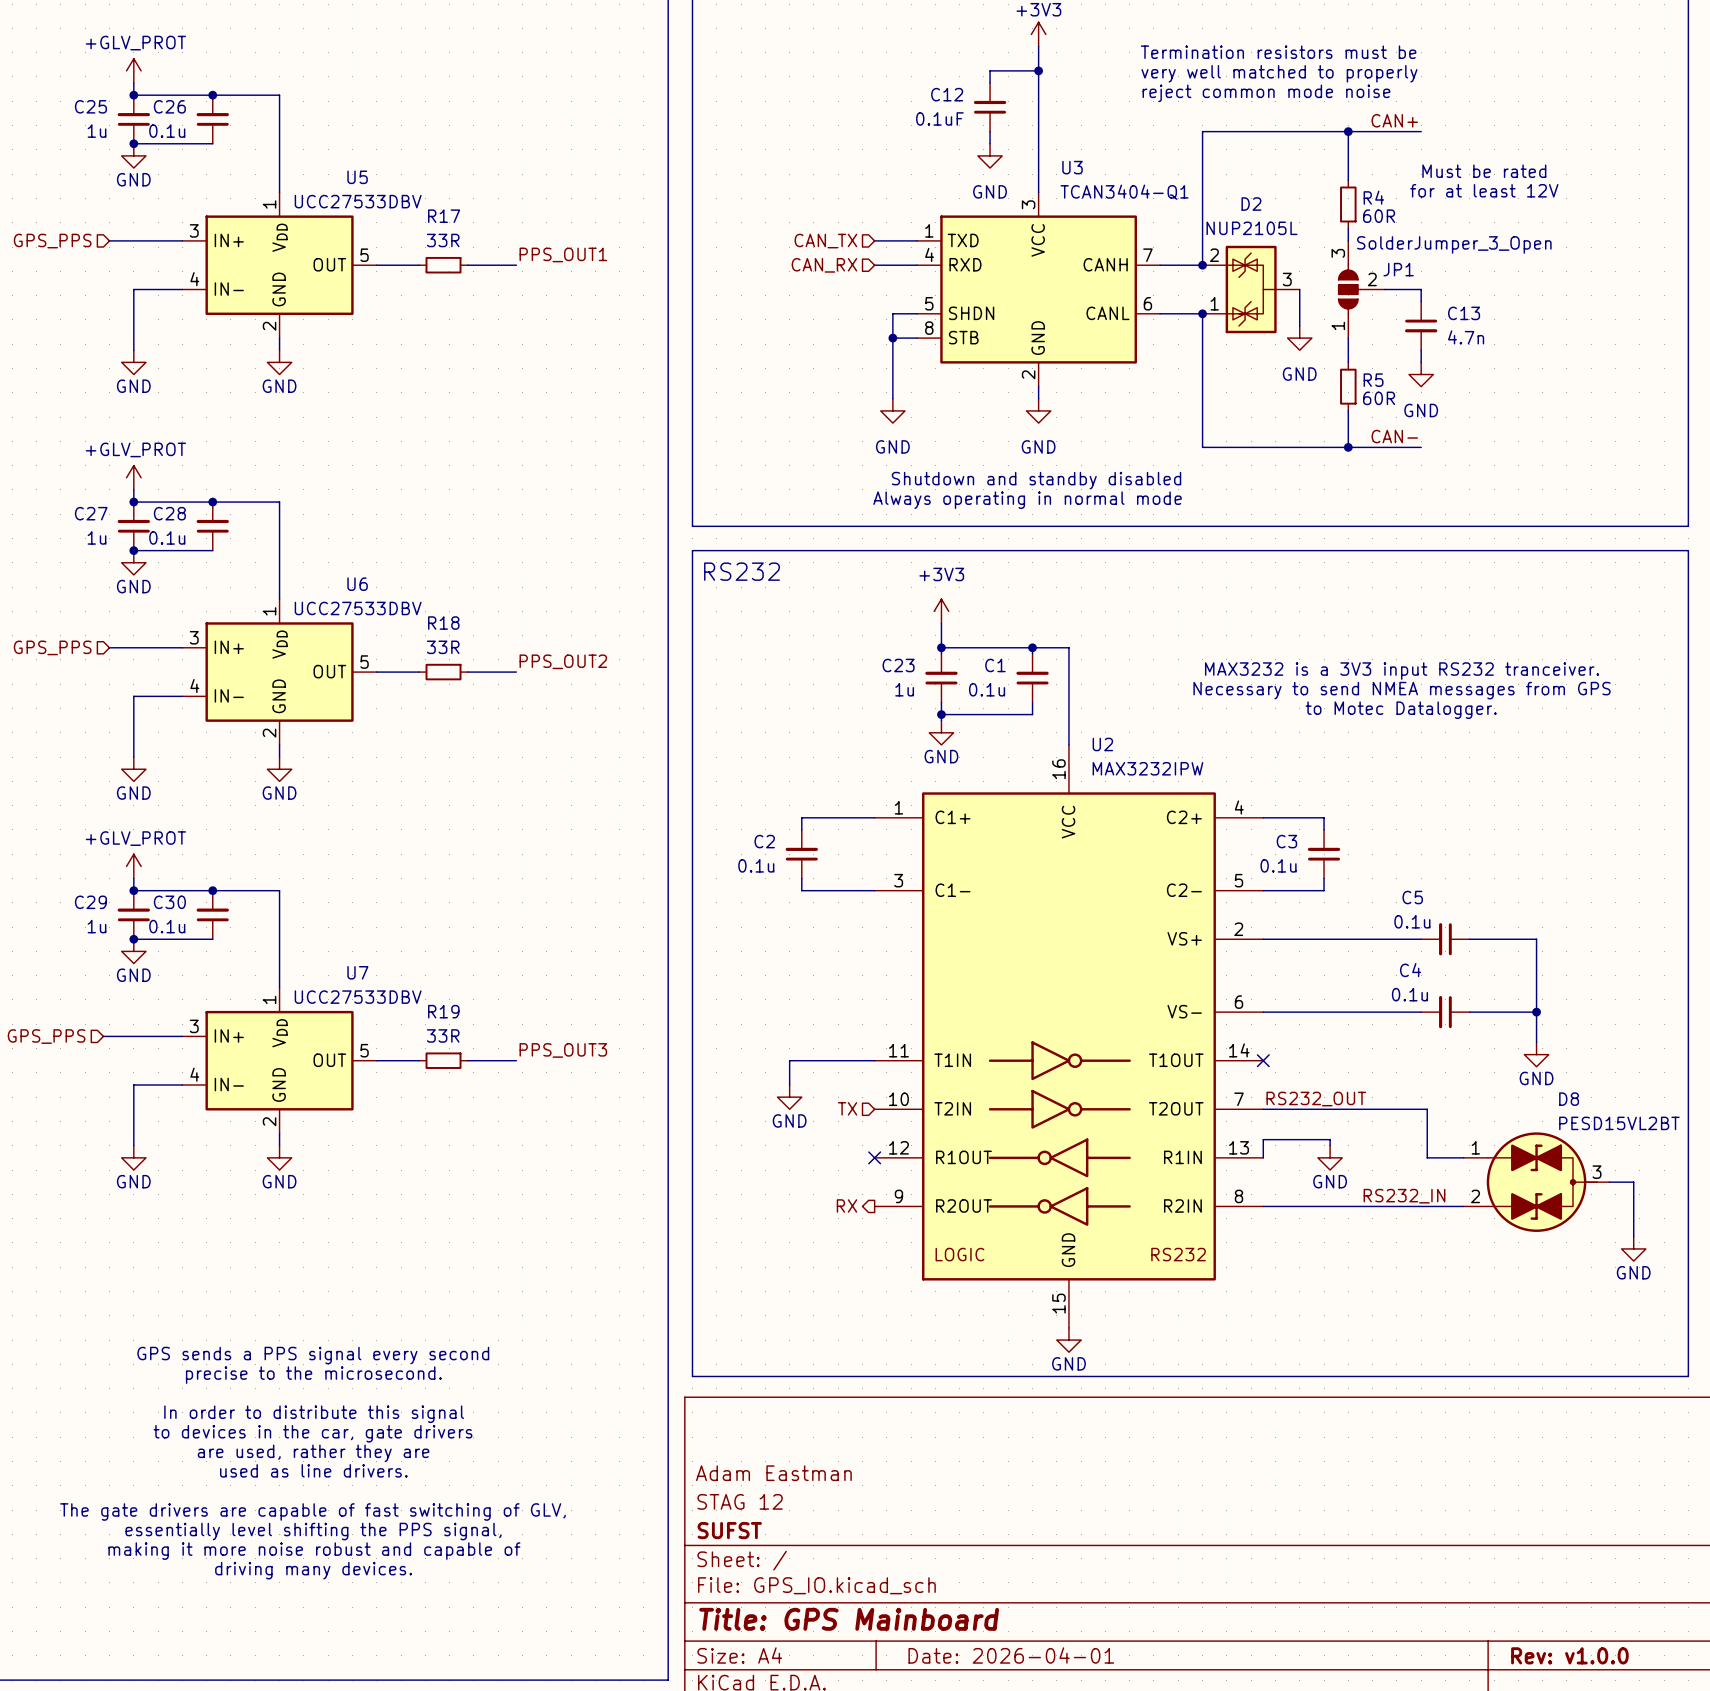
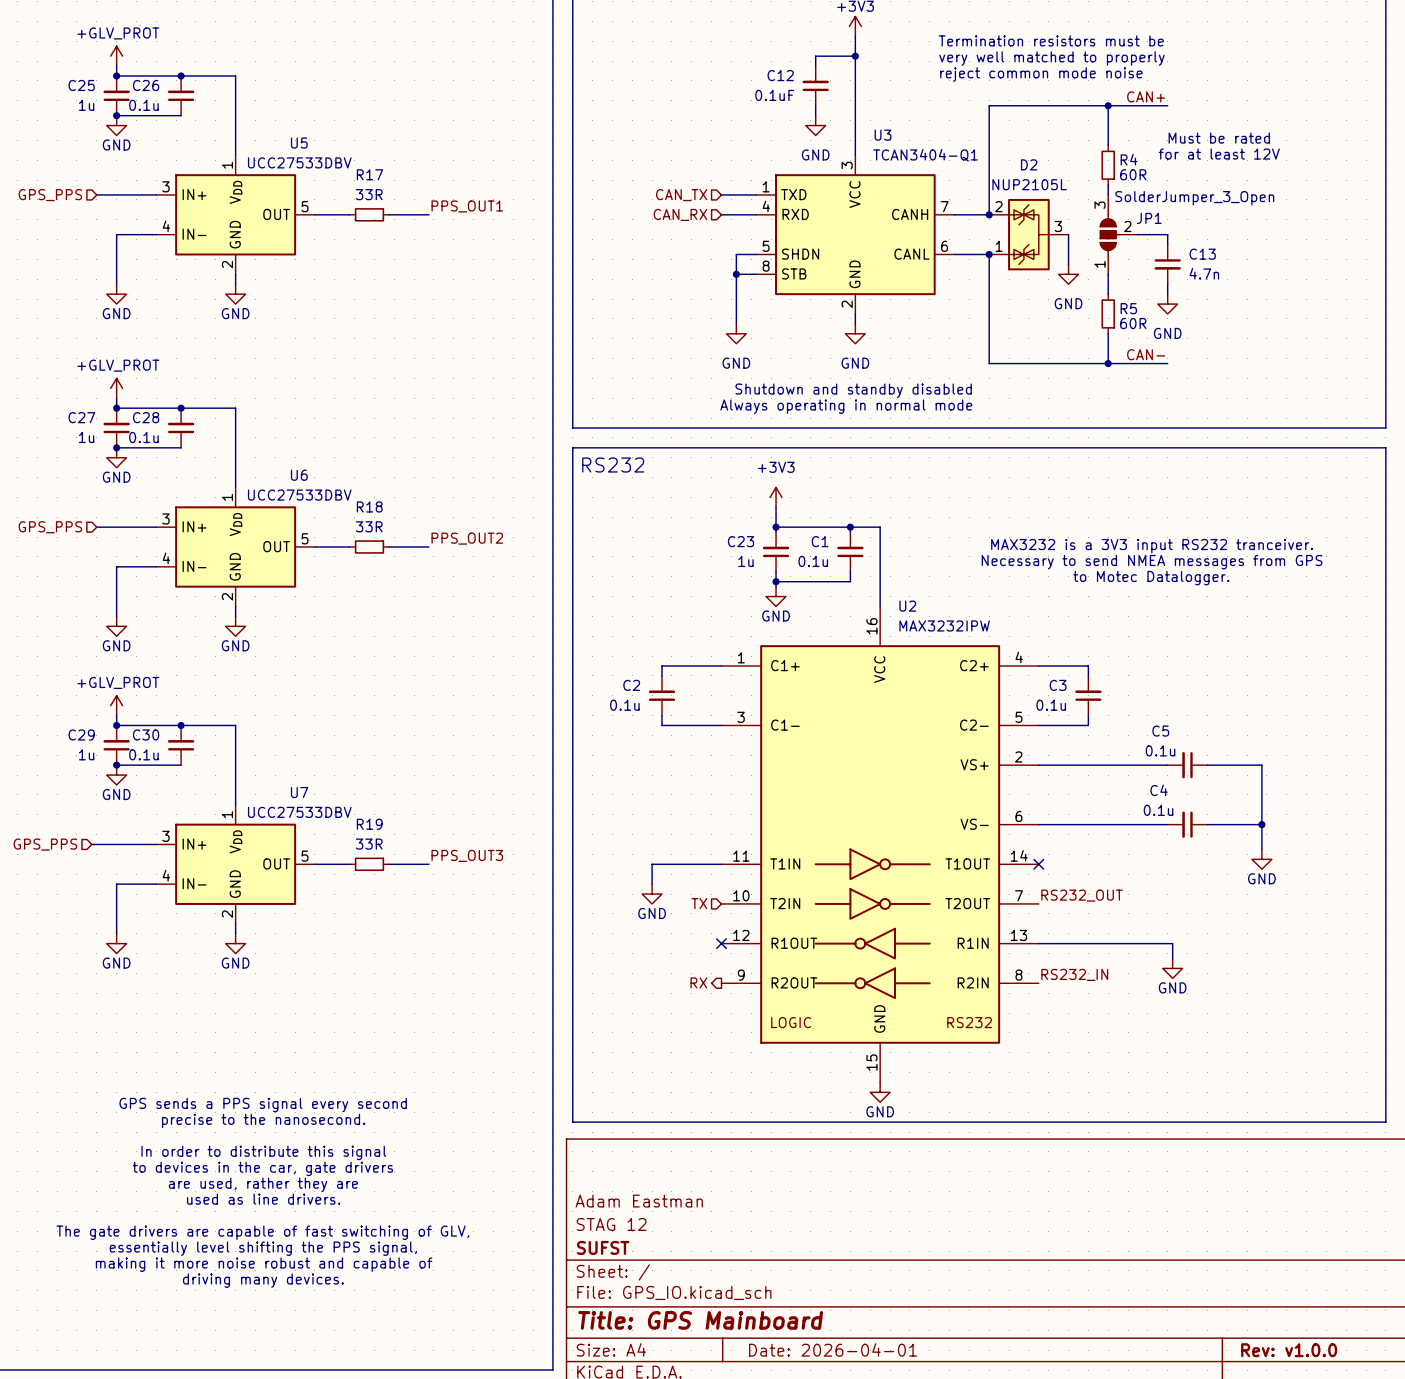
wire: (1263, 1109) (1427, 1109) (1427, 1157) (1463, 1157) -> none
wire: (1330, 1145) (1330, 1139) (1263, 1139) (1263, 1157) -> (1172, 958) (1172, 943) (1038, 943)
power symbol position: GND (1330, 1157) -> GND (1172, 968)
D8: PESD15VL2BT (1536, 1182) -> none
wire: (1609, 1182) (1633, 1182) (1633, 1236) -> none
label position: RS232_IN (1404, 1196) -> RS232_IN (1074, 974)
wire: (1263, 1206) (1463, 1206) -> none
power symbol: GND (1633, 1248) -> none
text: precise to the microsecond. (313, 1375) -> precise to the nanosecond. (263, 1120)

